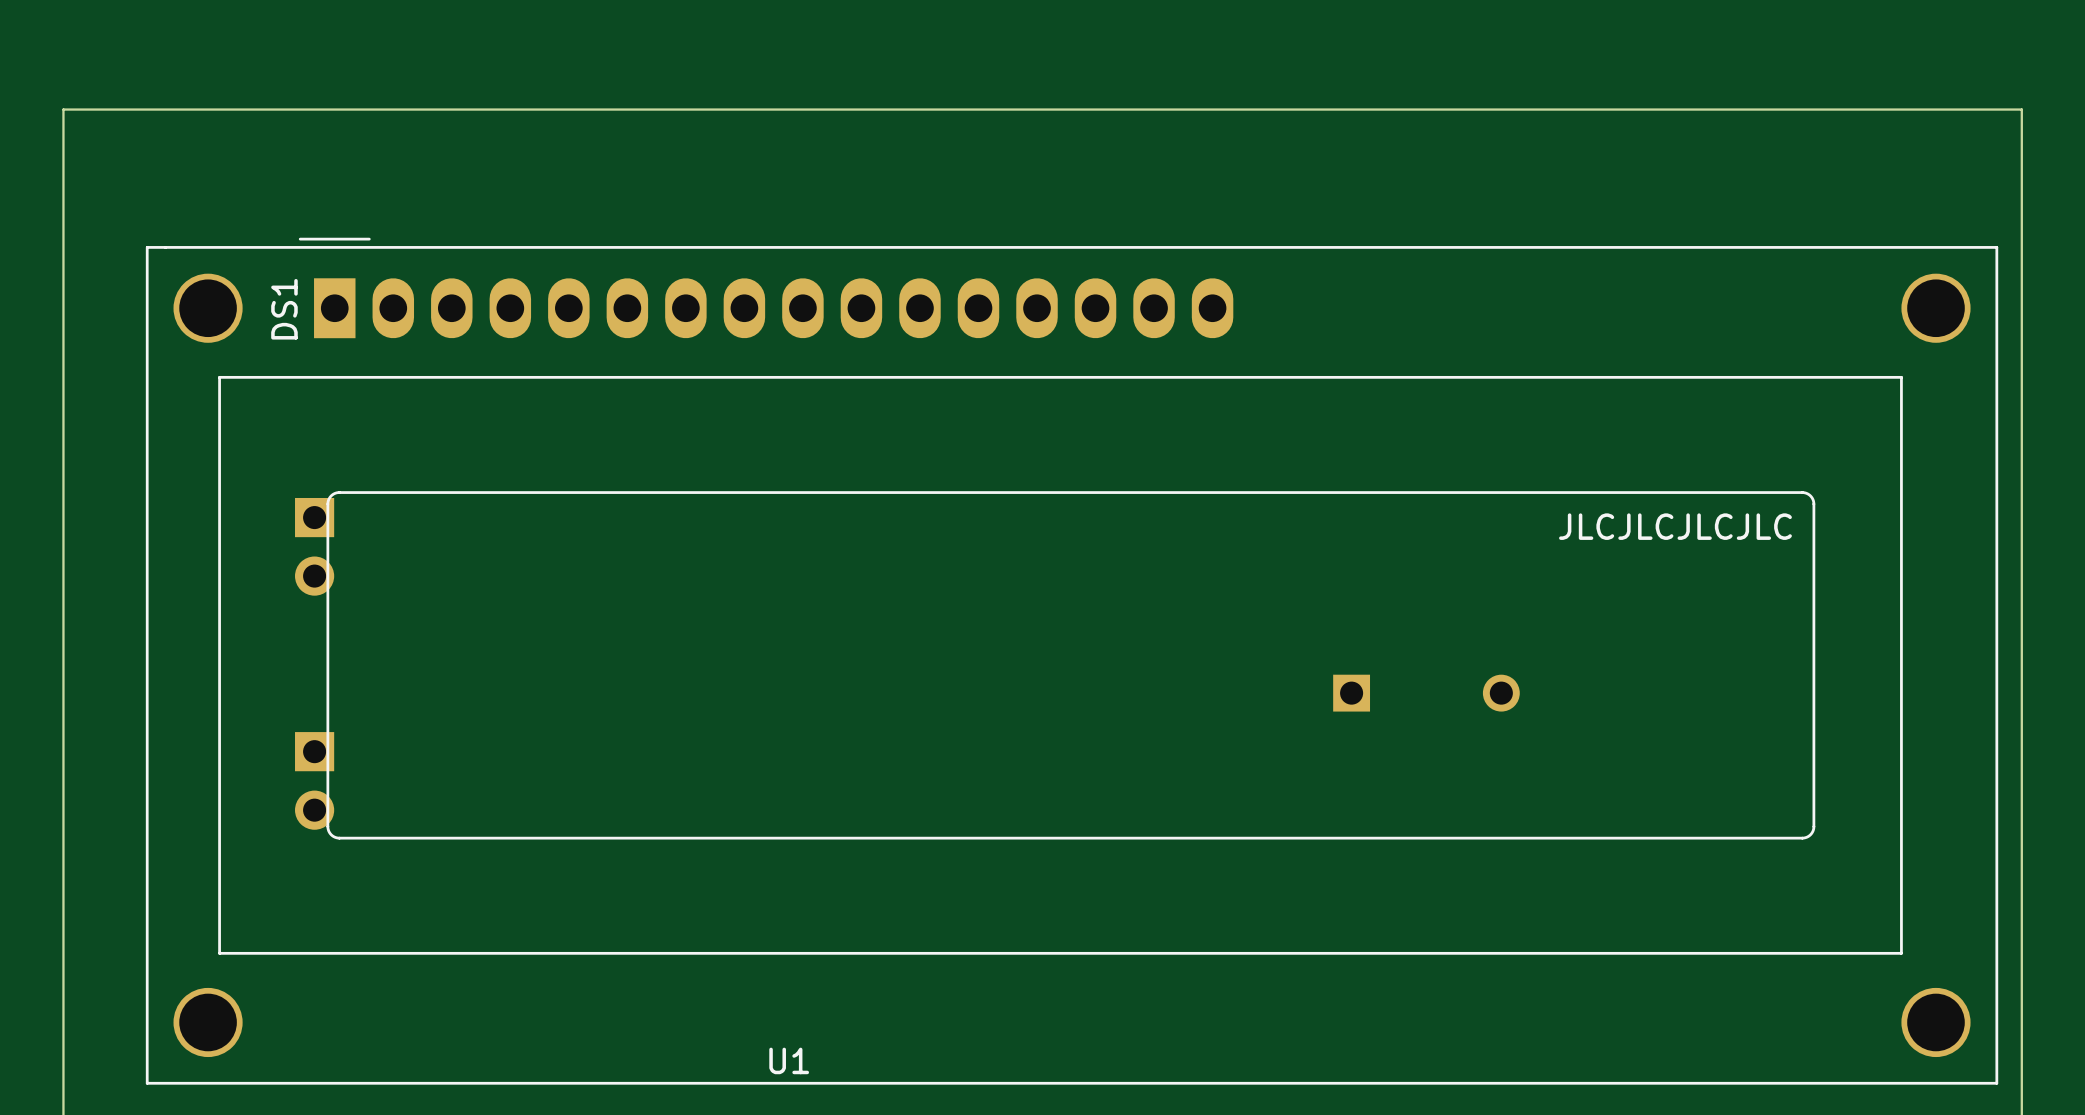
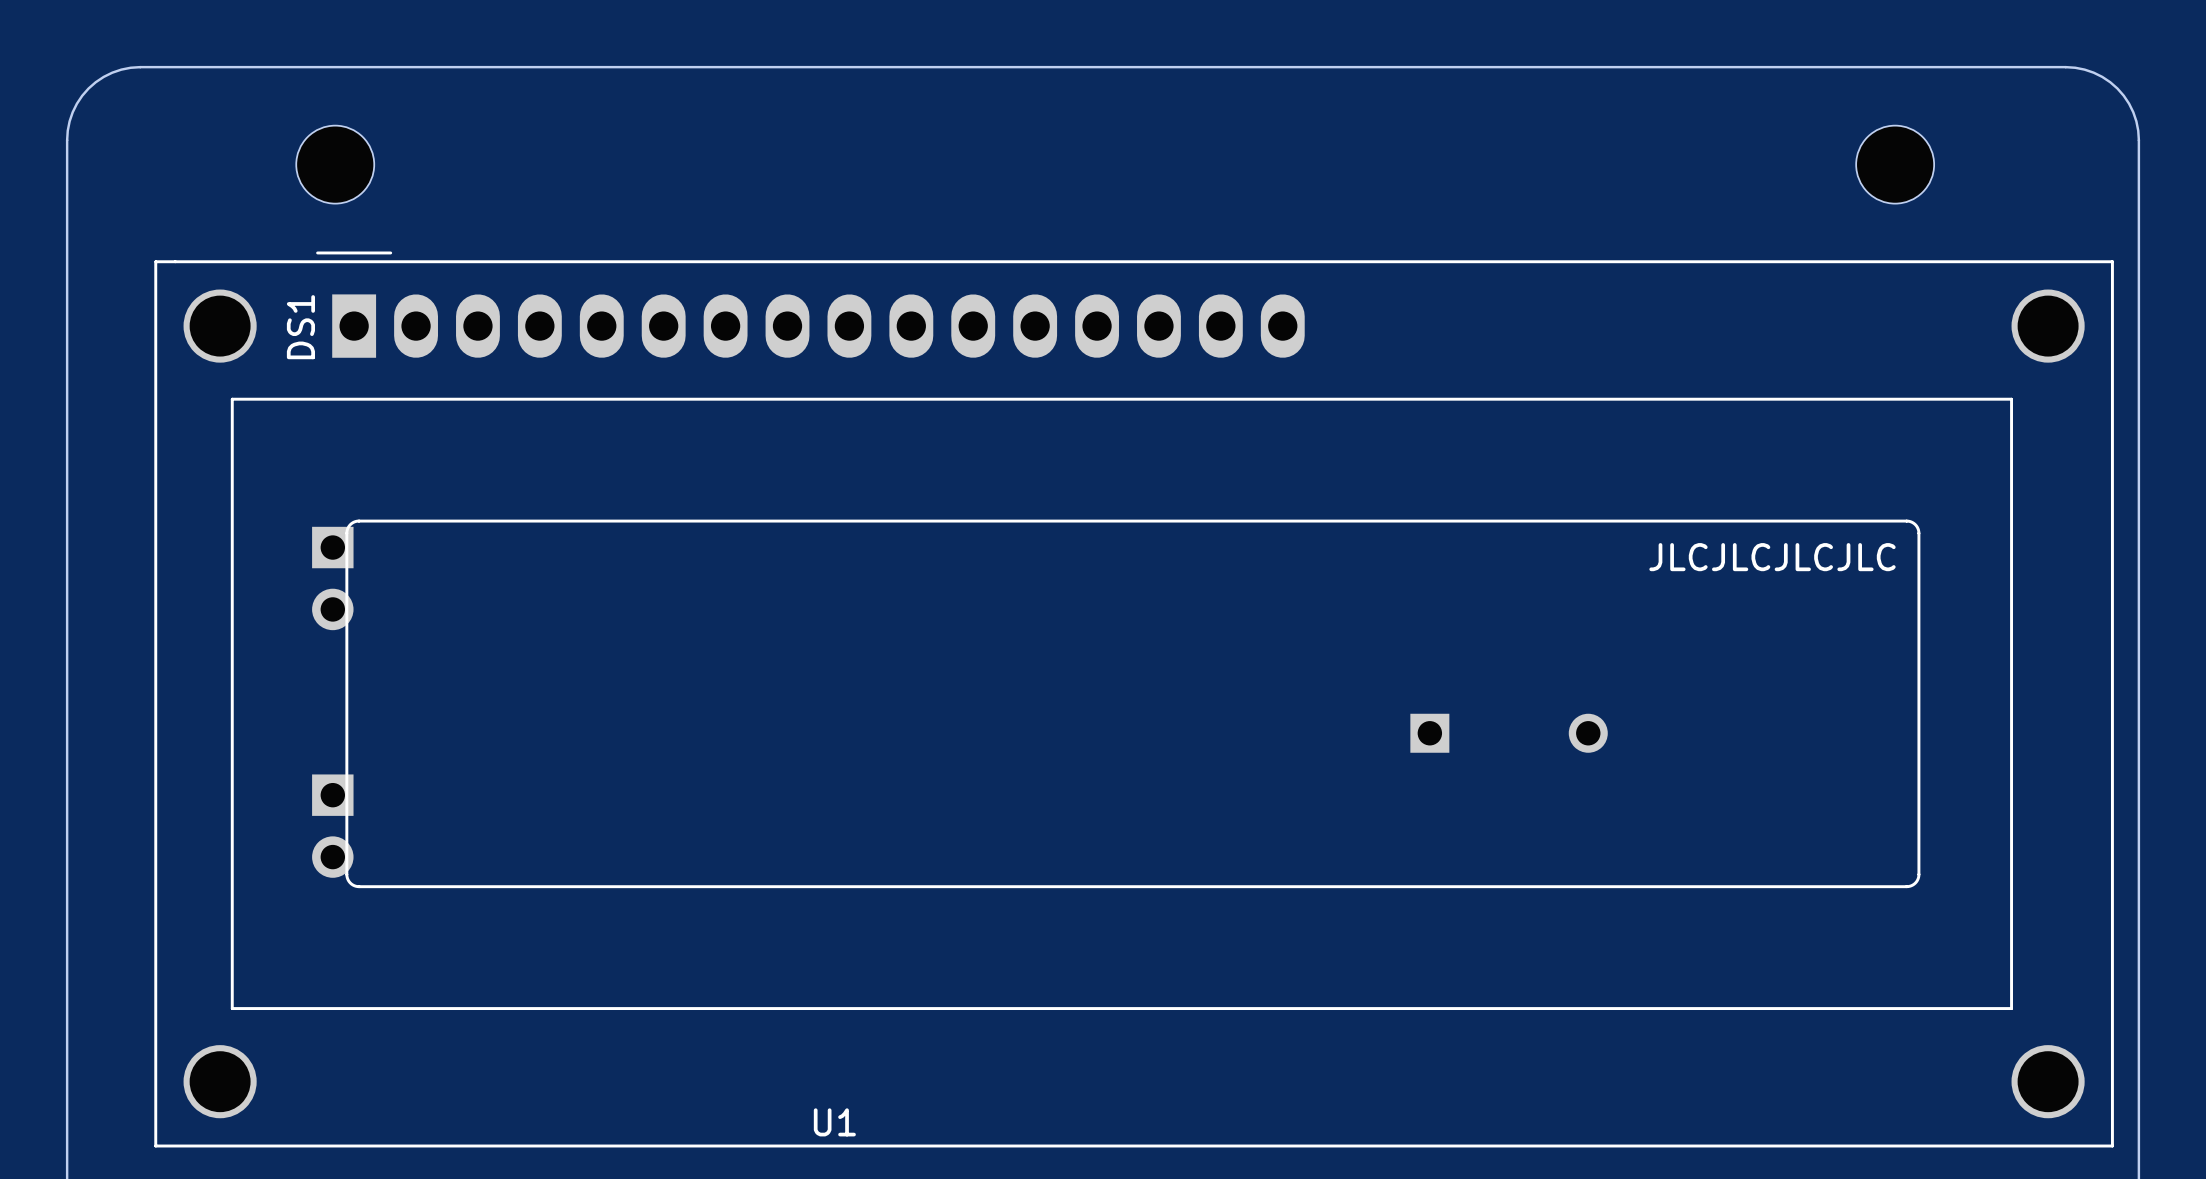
board edge: (63, 132) (63, 109) (2021, 109) (2021, 132) -> (67, 140) (72, 112) (88, 88) (112, 72) (140, 67) (2065, 67) (2093, 72) (2117, 88) (2133, 112) (2138, 140)
part: none -> (335, 164)
part: none -> (1895, 164)

